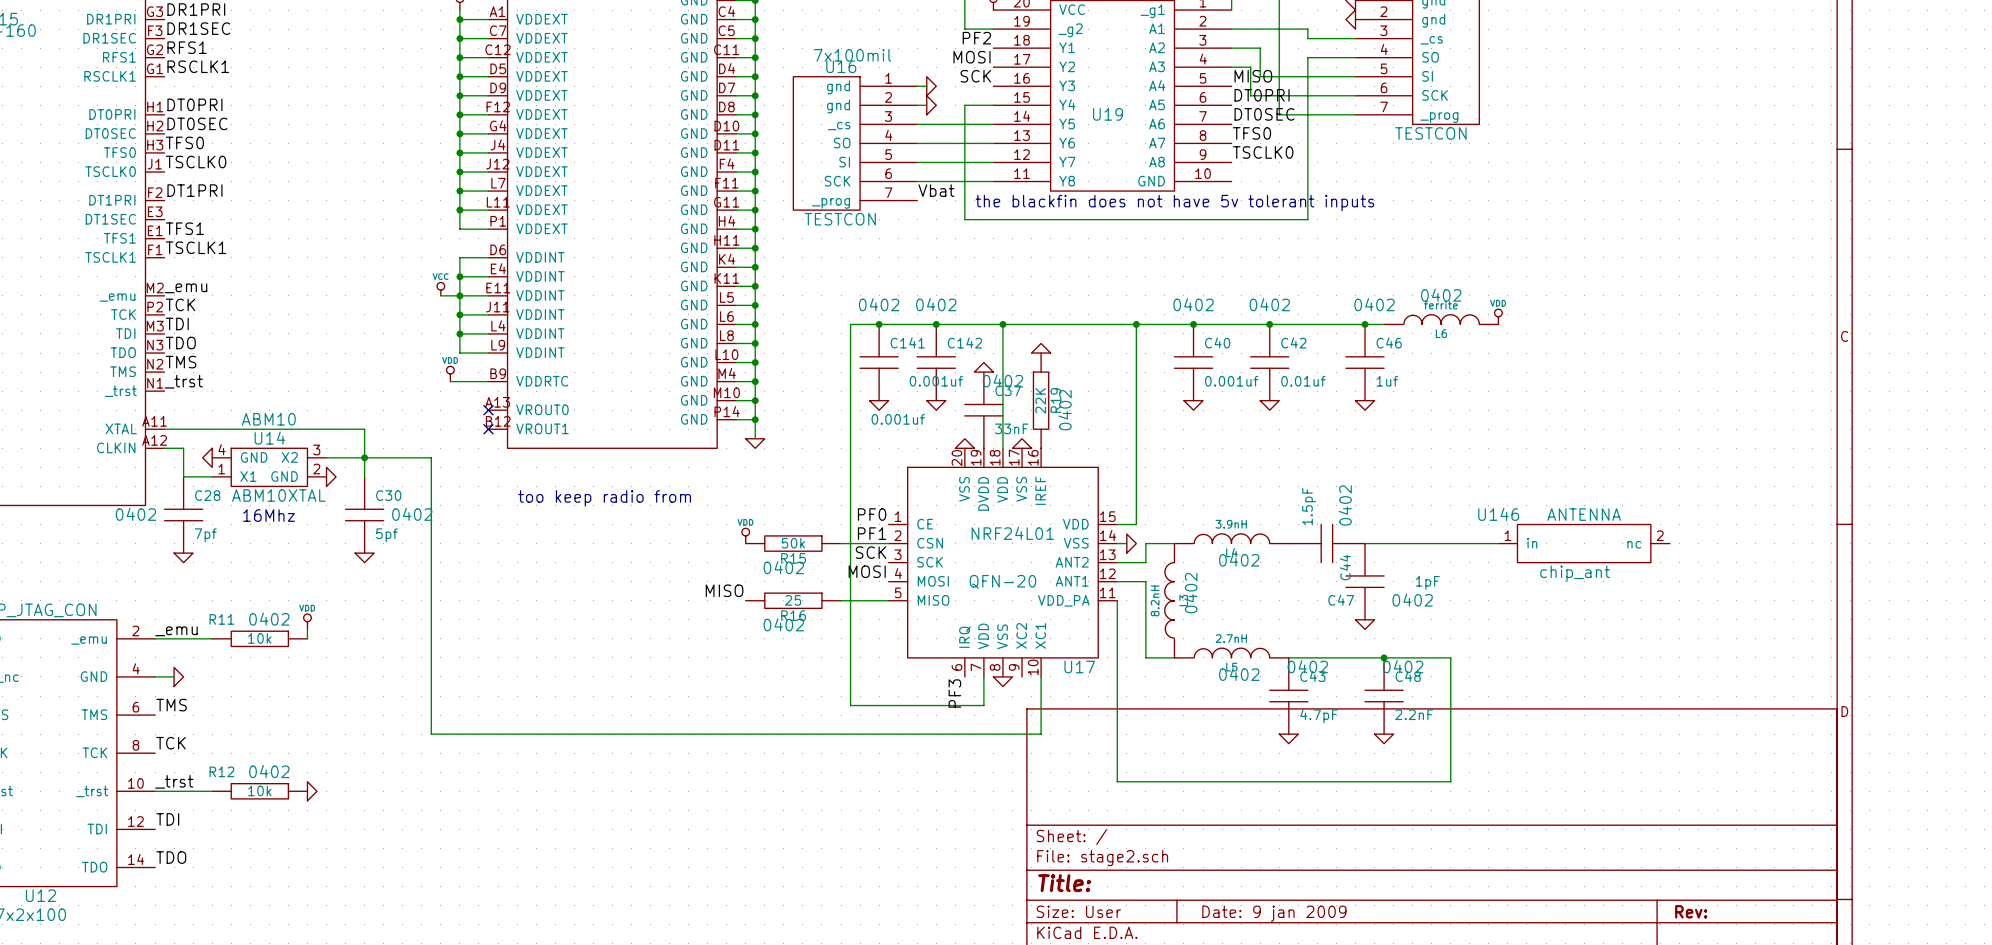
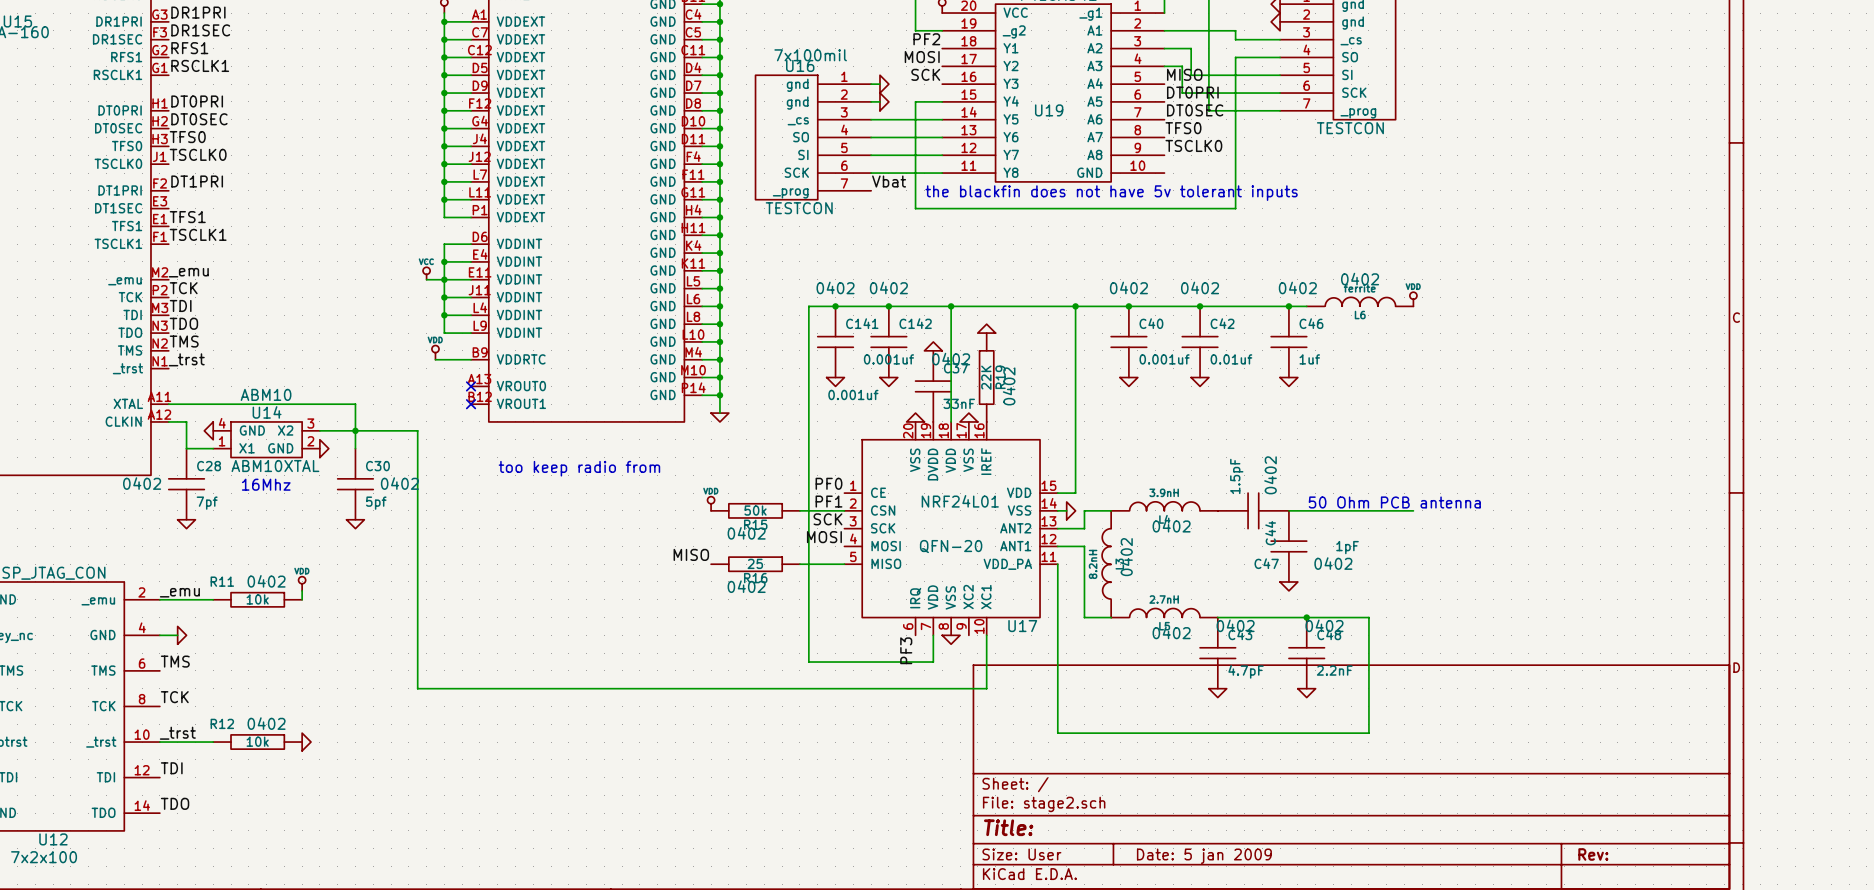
text: none -> 50 Ohm PCB antenna (1394, 502)
U146: ANTENNA (1584, 543) -> none
title block: Date: 9 jan 2009 (1274, 913) -> Date: 5 jan 2009 (1204, 856)

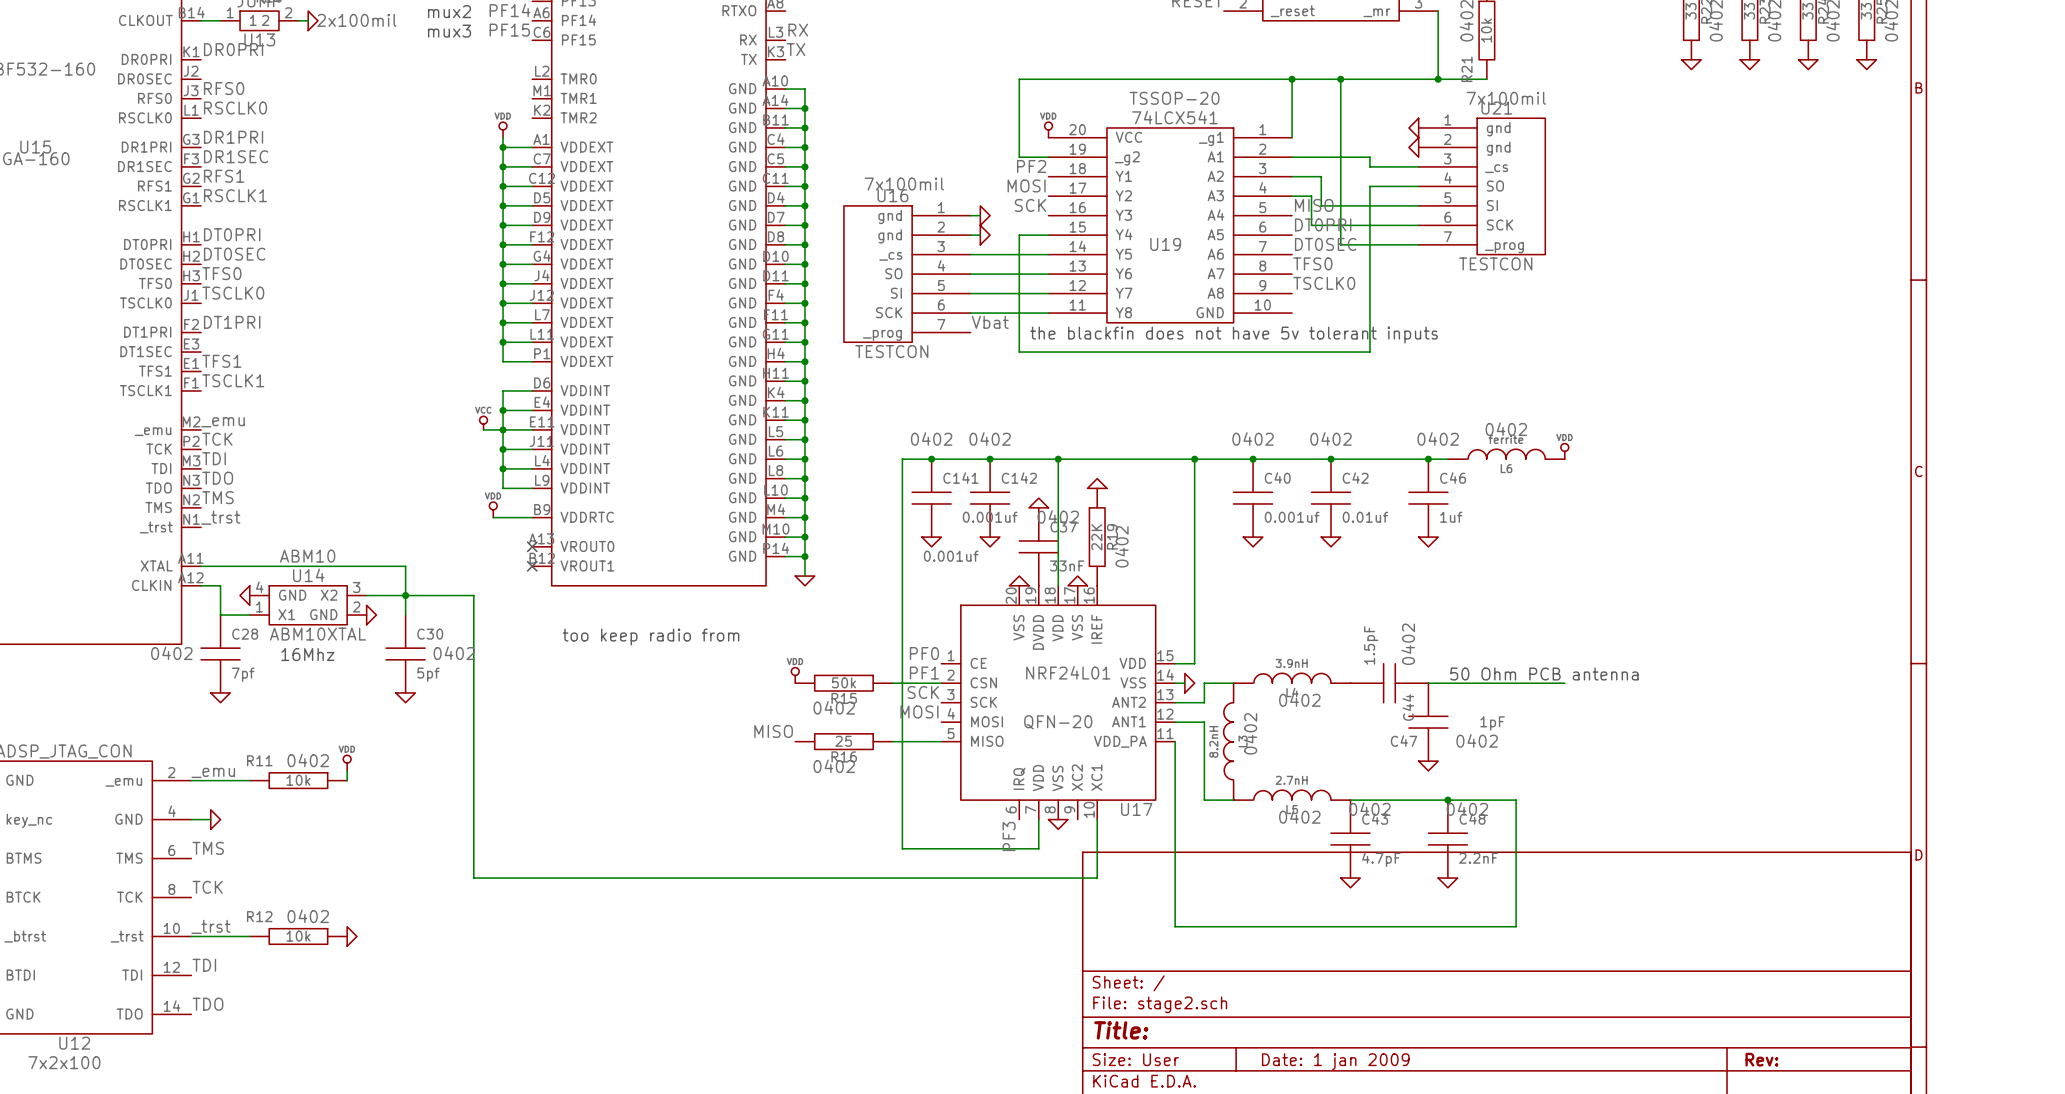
title block: Date: 5 jan 2009 (1204, 856) -> Date: 1 jan 2009 (1335, 1061)

